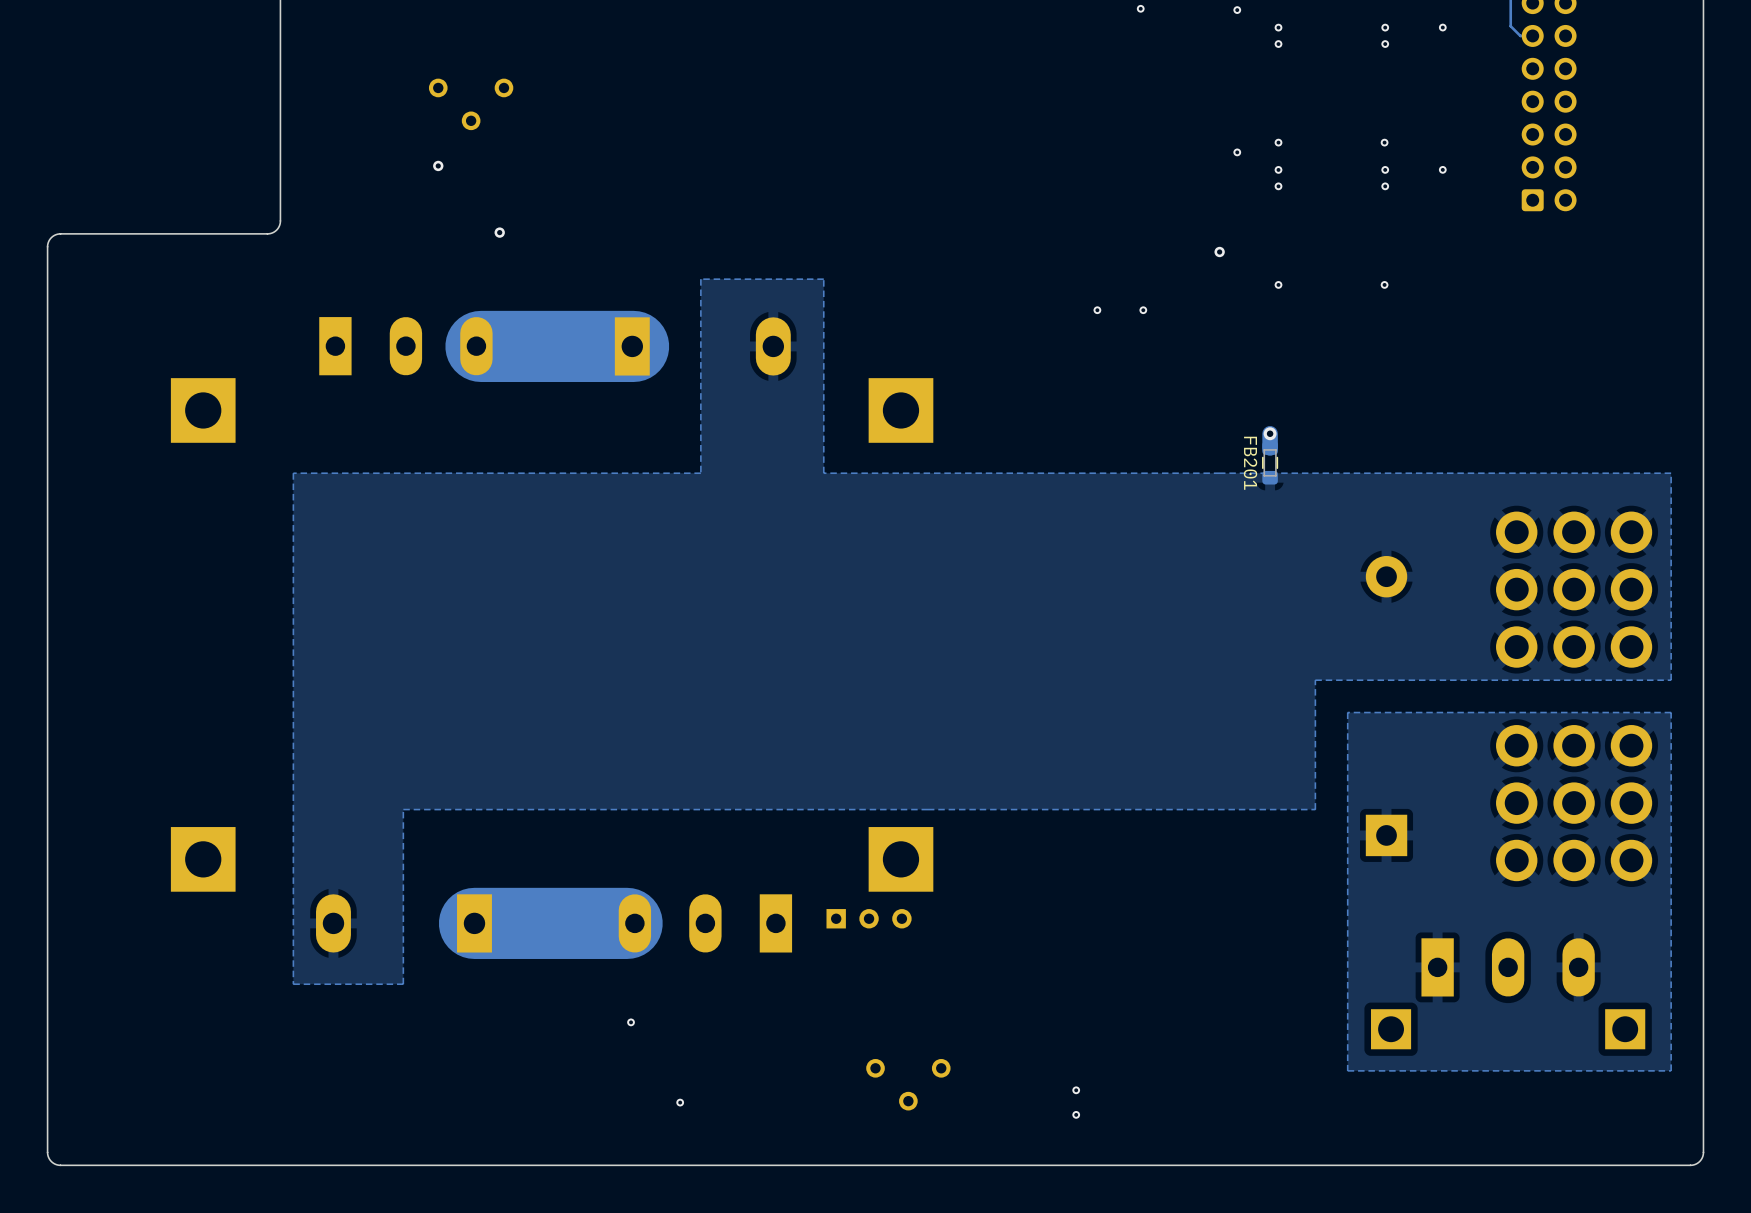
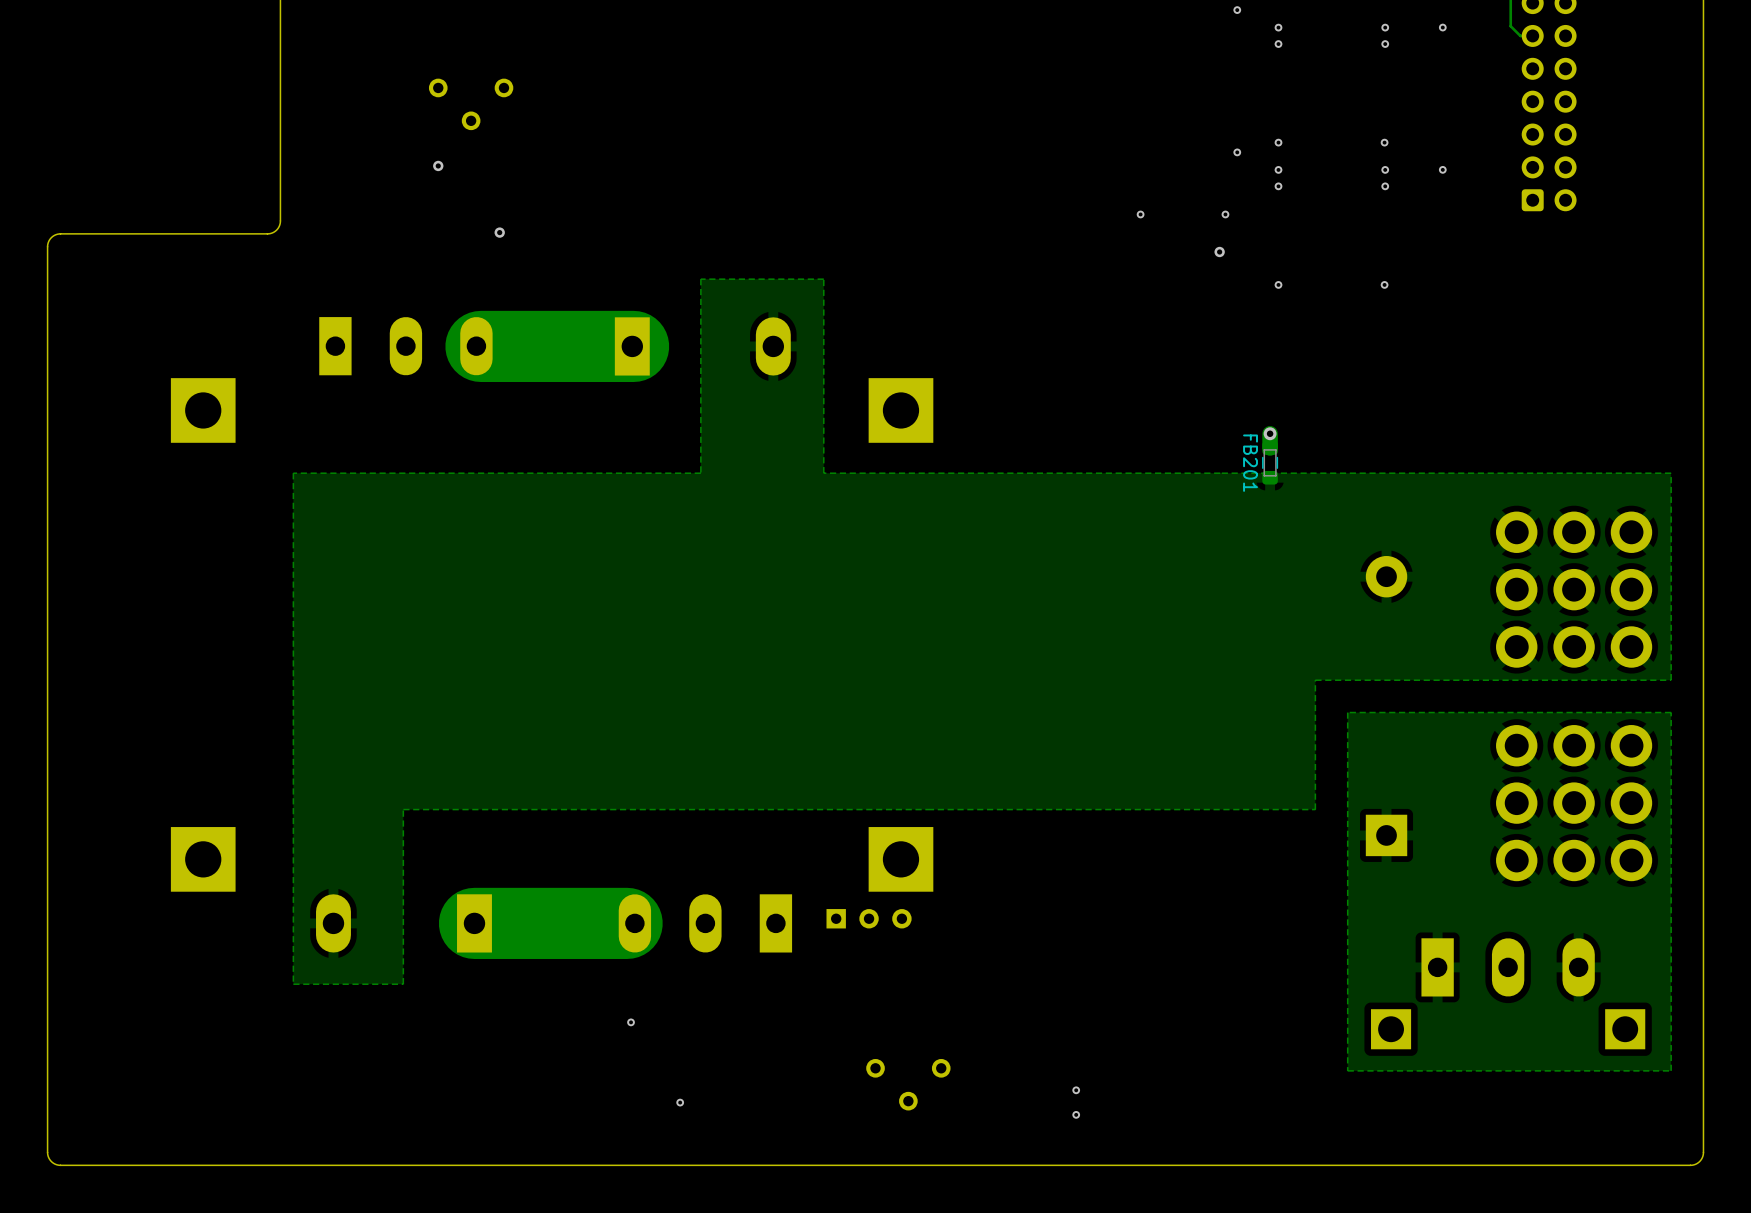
via: (1140, 8) -> none
via: none -> (1140, 214)
via: none -> (1225, 214)
via: (1097, 310) -> none
via: (1143, 310) -> none

